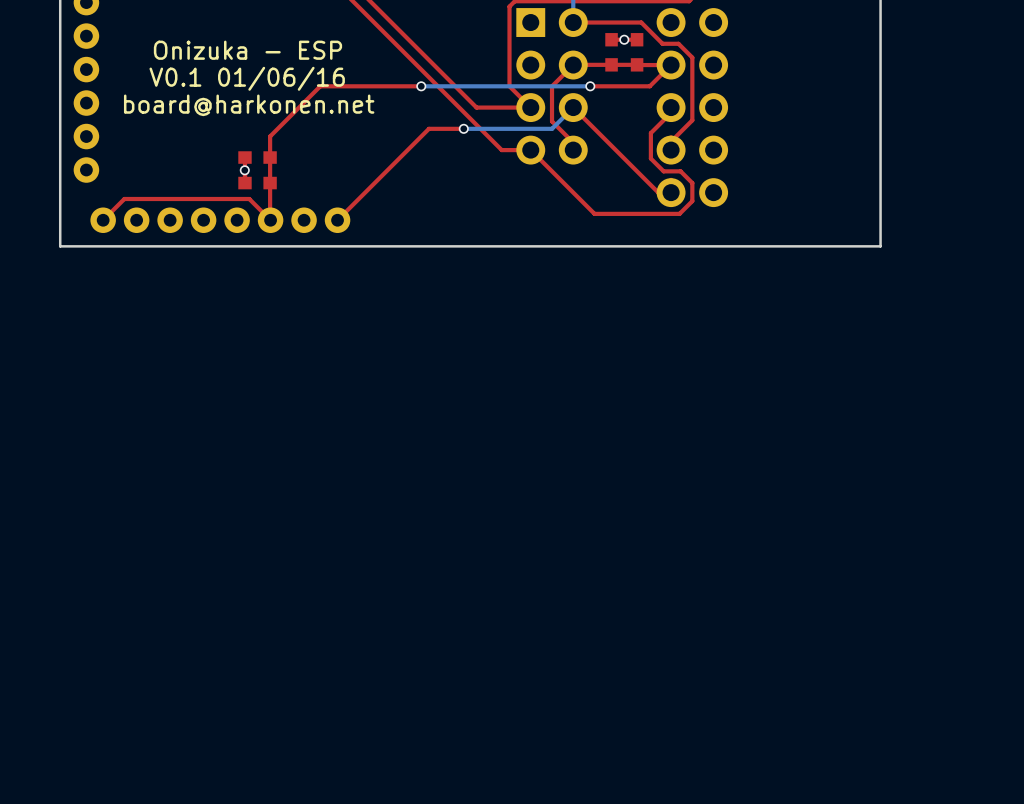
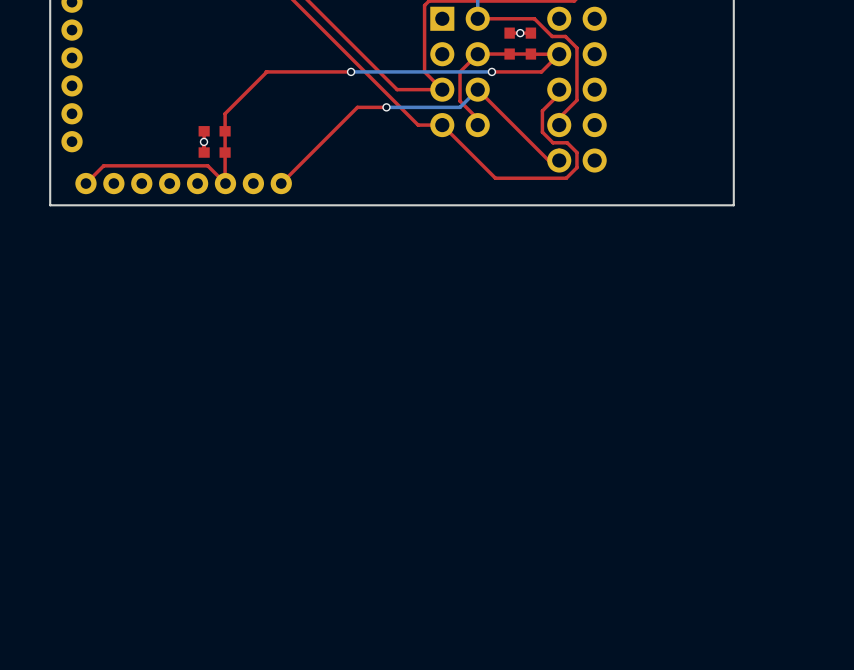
text: Onizuka - ESP (247, 50) -> none
text: V0.1 01/06/16 (247, 78) -> none
text: board@harkonen.net (249, 105) -> none

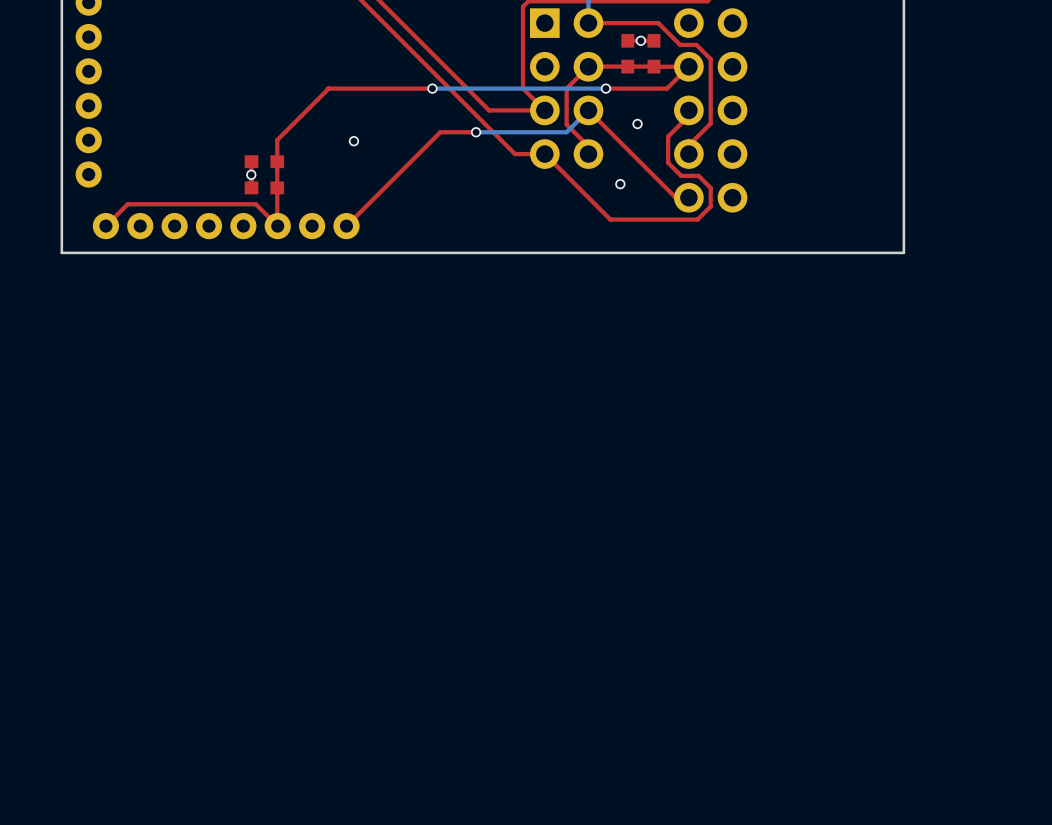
via: none -> (637, 124)
via: none -> (353, 141)
via: none -> (620, 184)

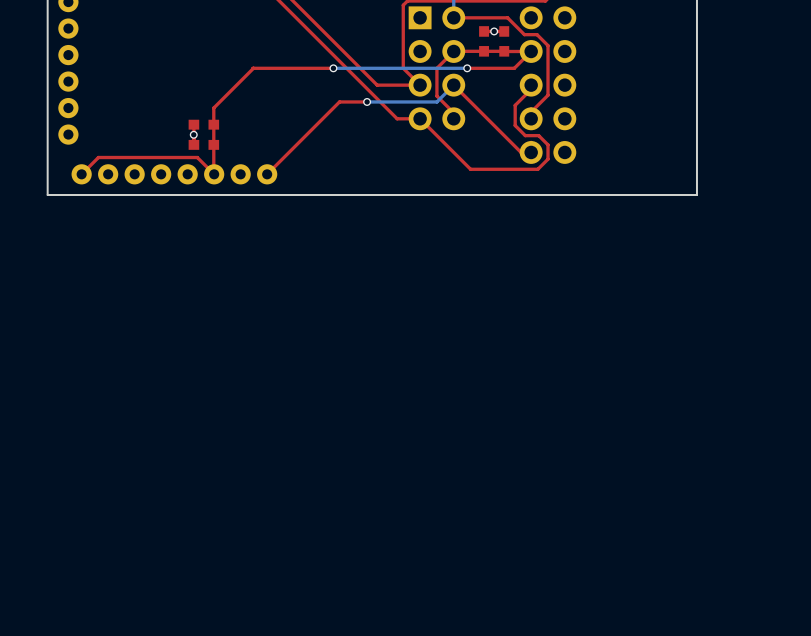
via: (637, 124) -> none
via: (353, 141) -> none
via: (620, 184) -> none

